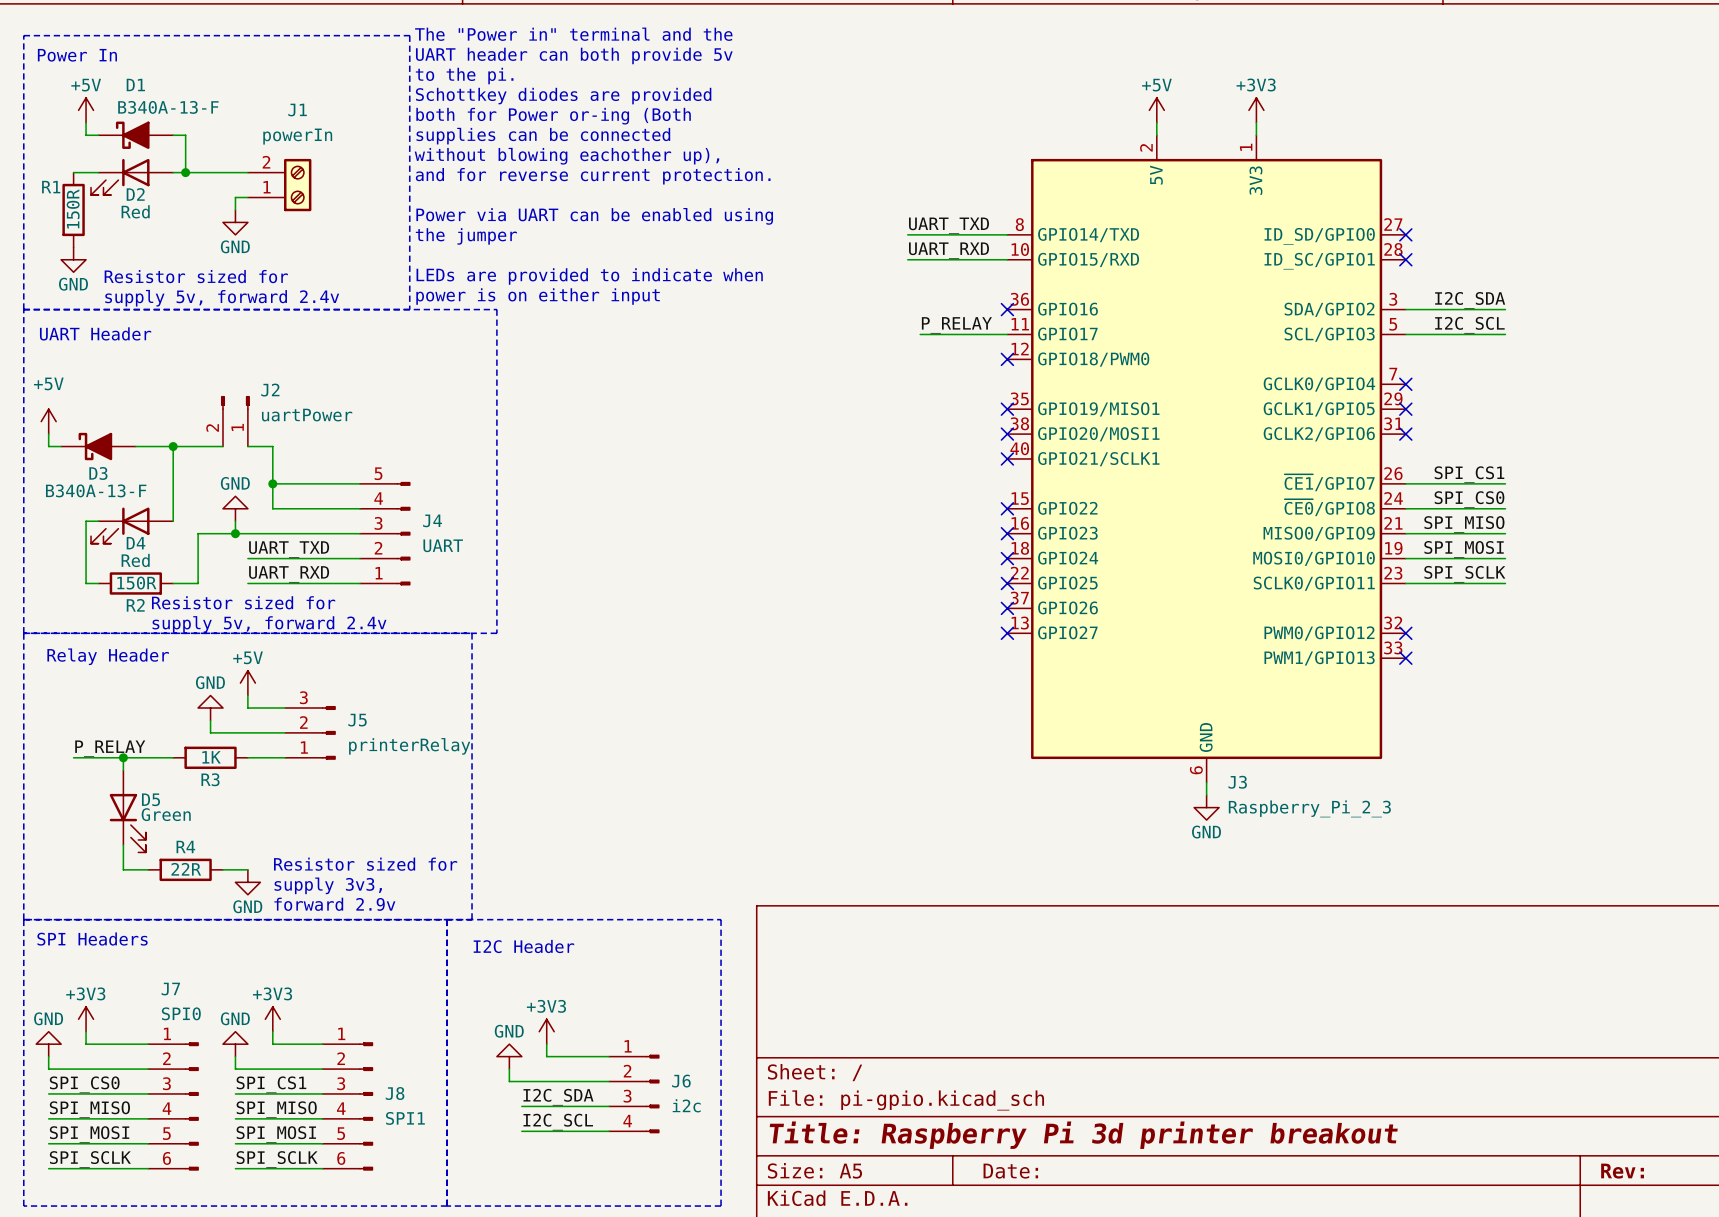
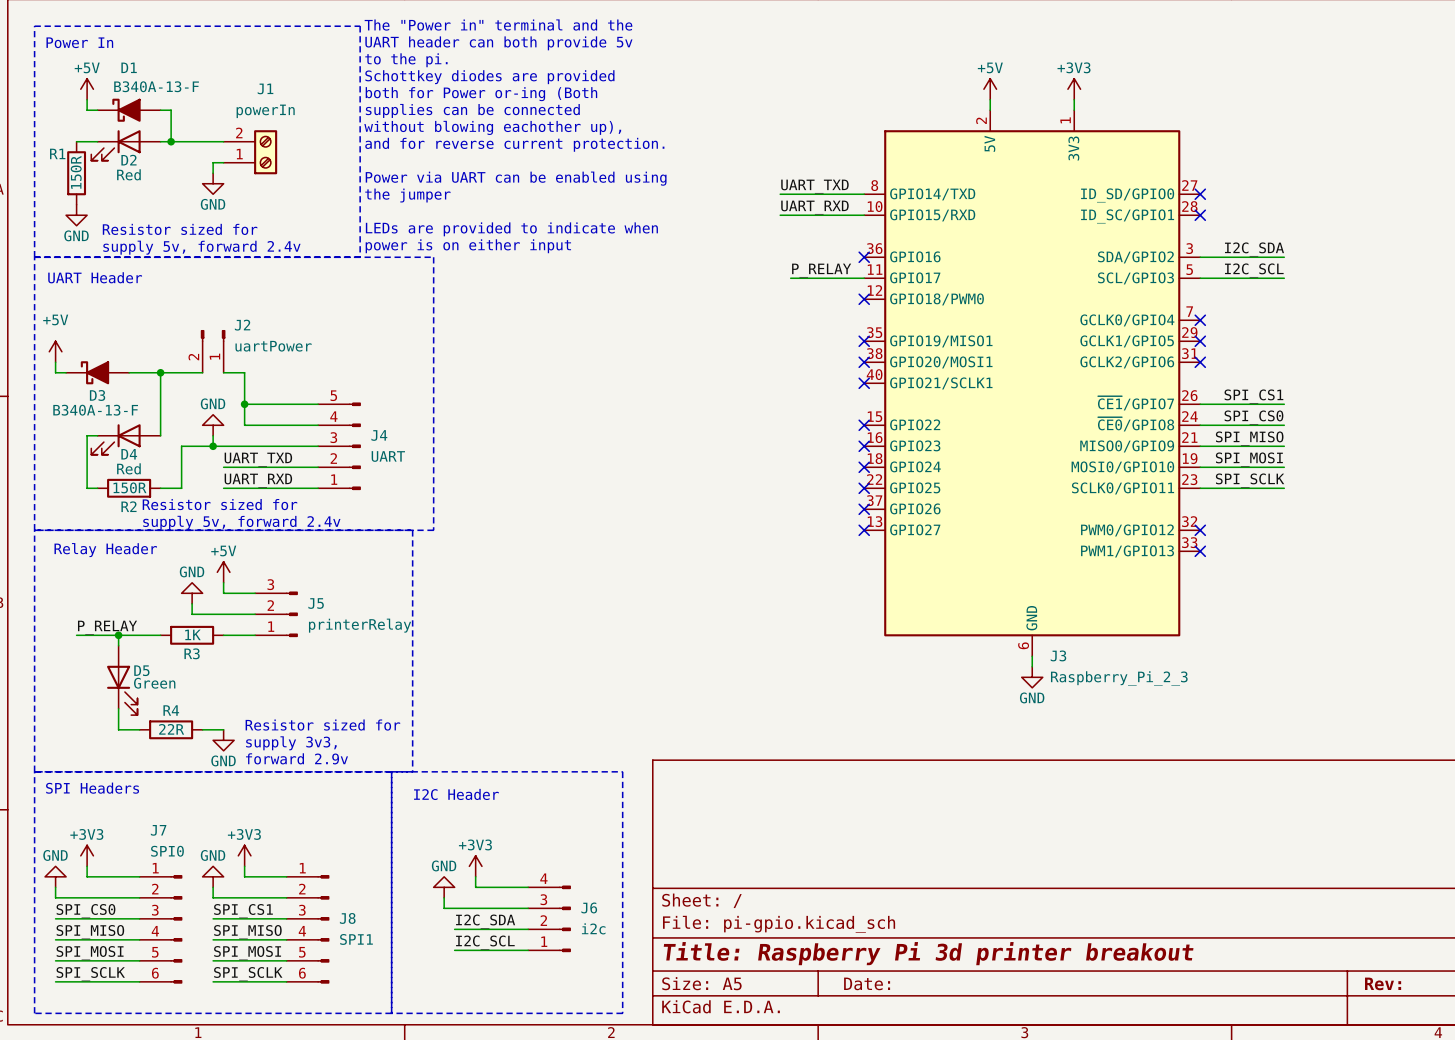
J6 flip: as is (652, 1093) -> up-down (564, 918)

